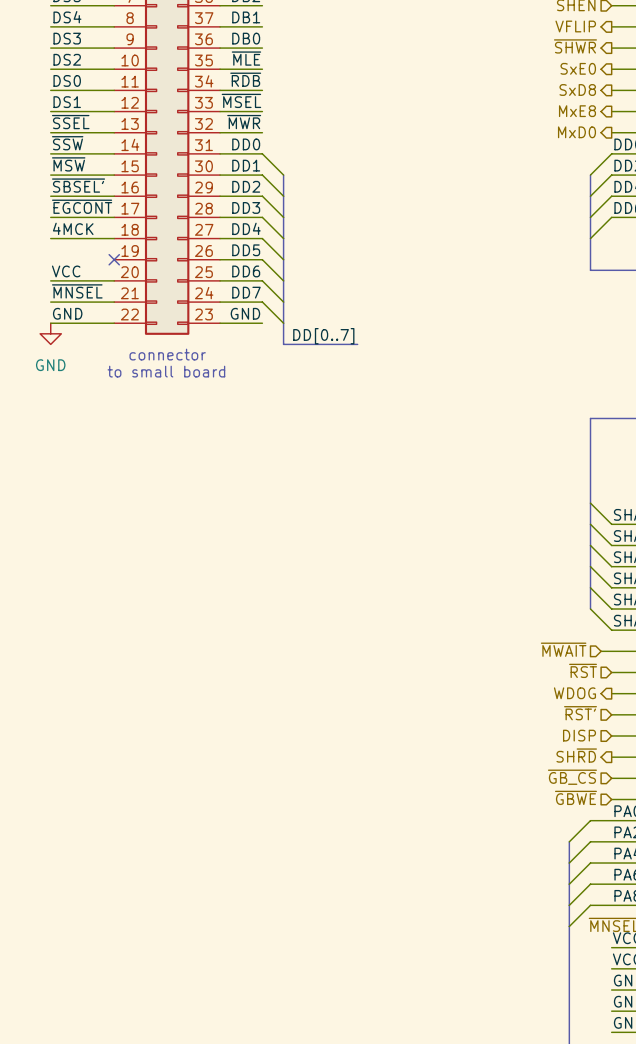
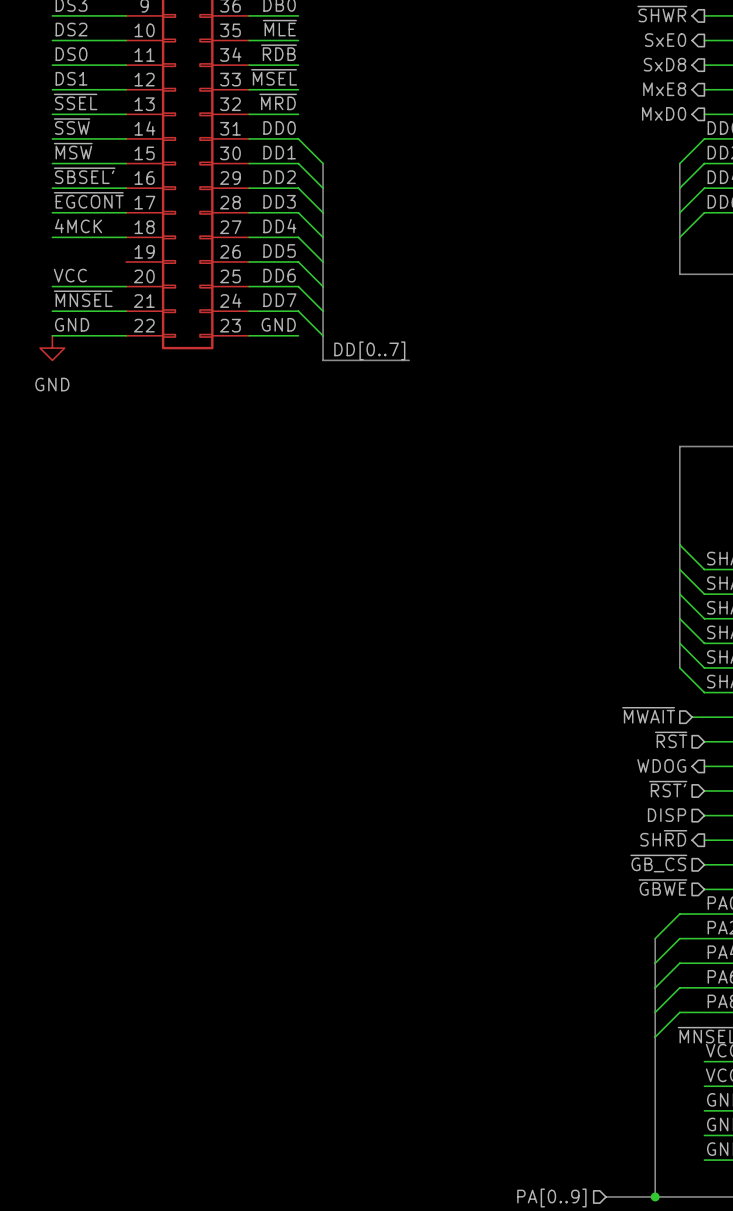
label: ~{MWR} (244, 122) -> ~{MRD} (278, 101)
no-connect mark: (114, 259) -> none
text: connector (167, 354) -> none
text: to small board (166, 371) -> none

